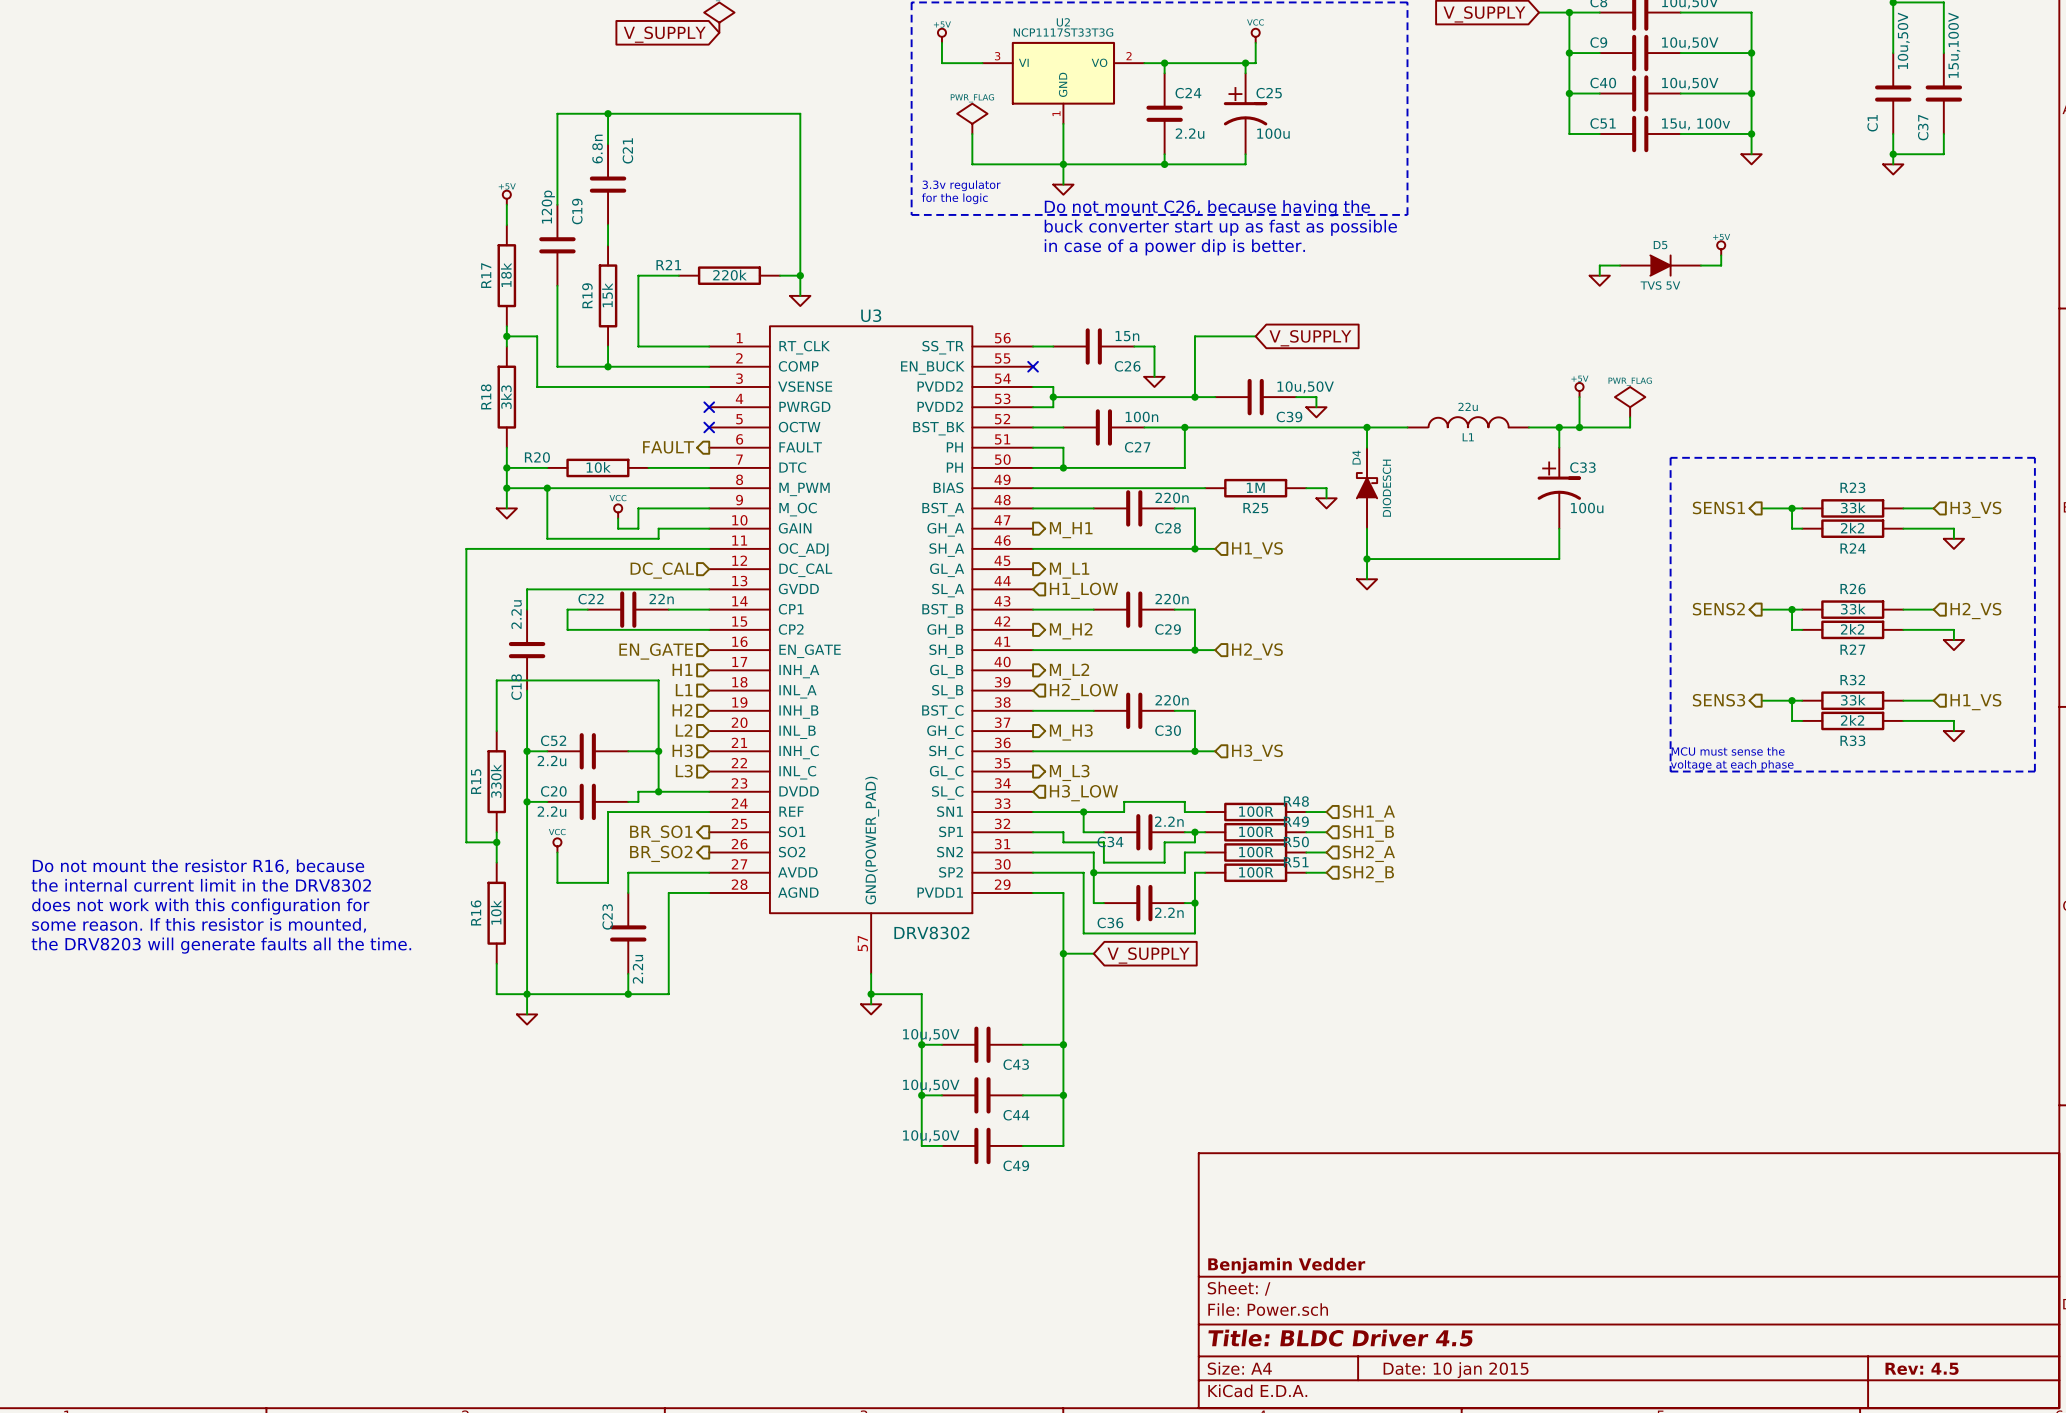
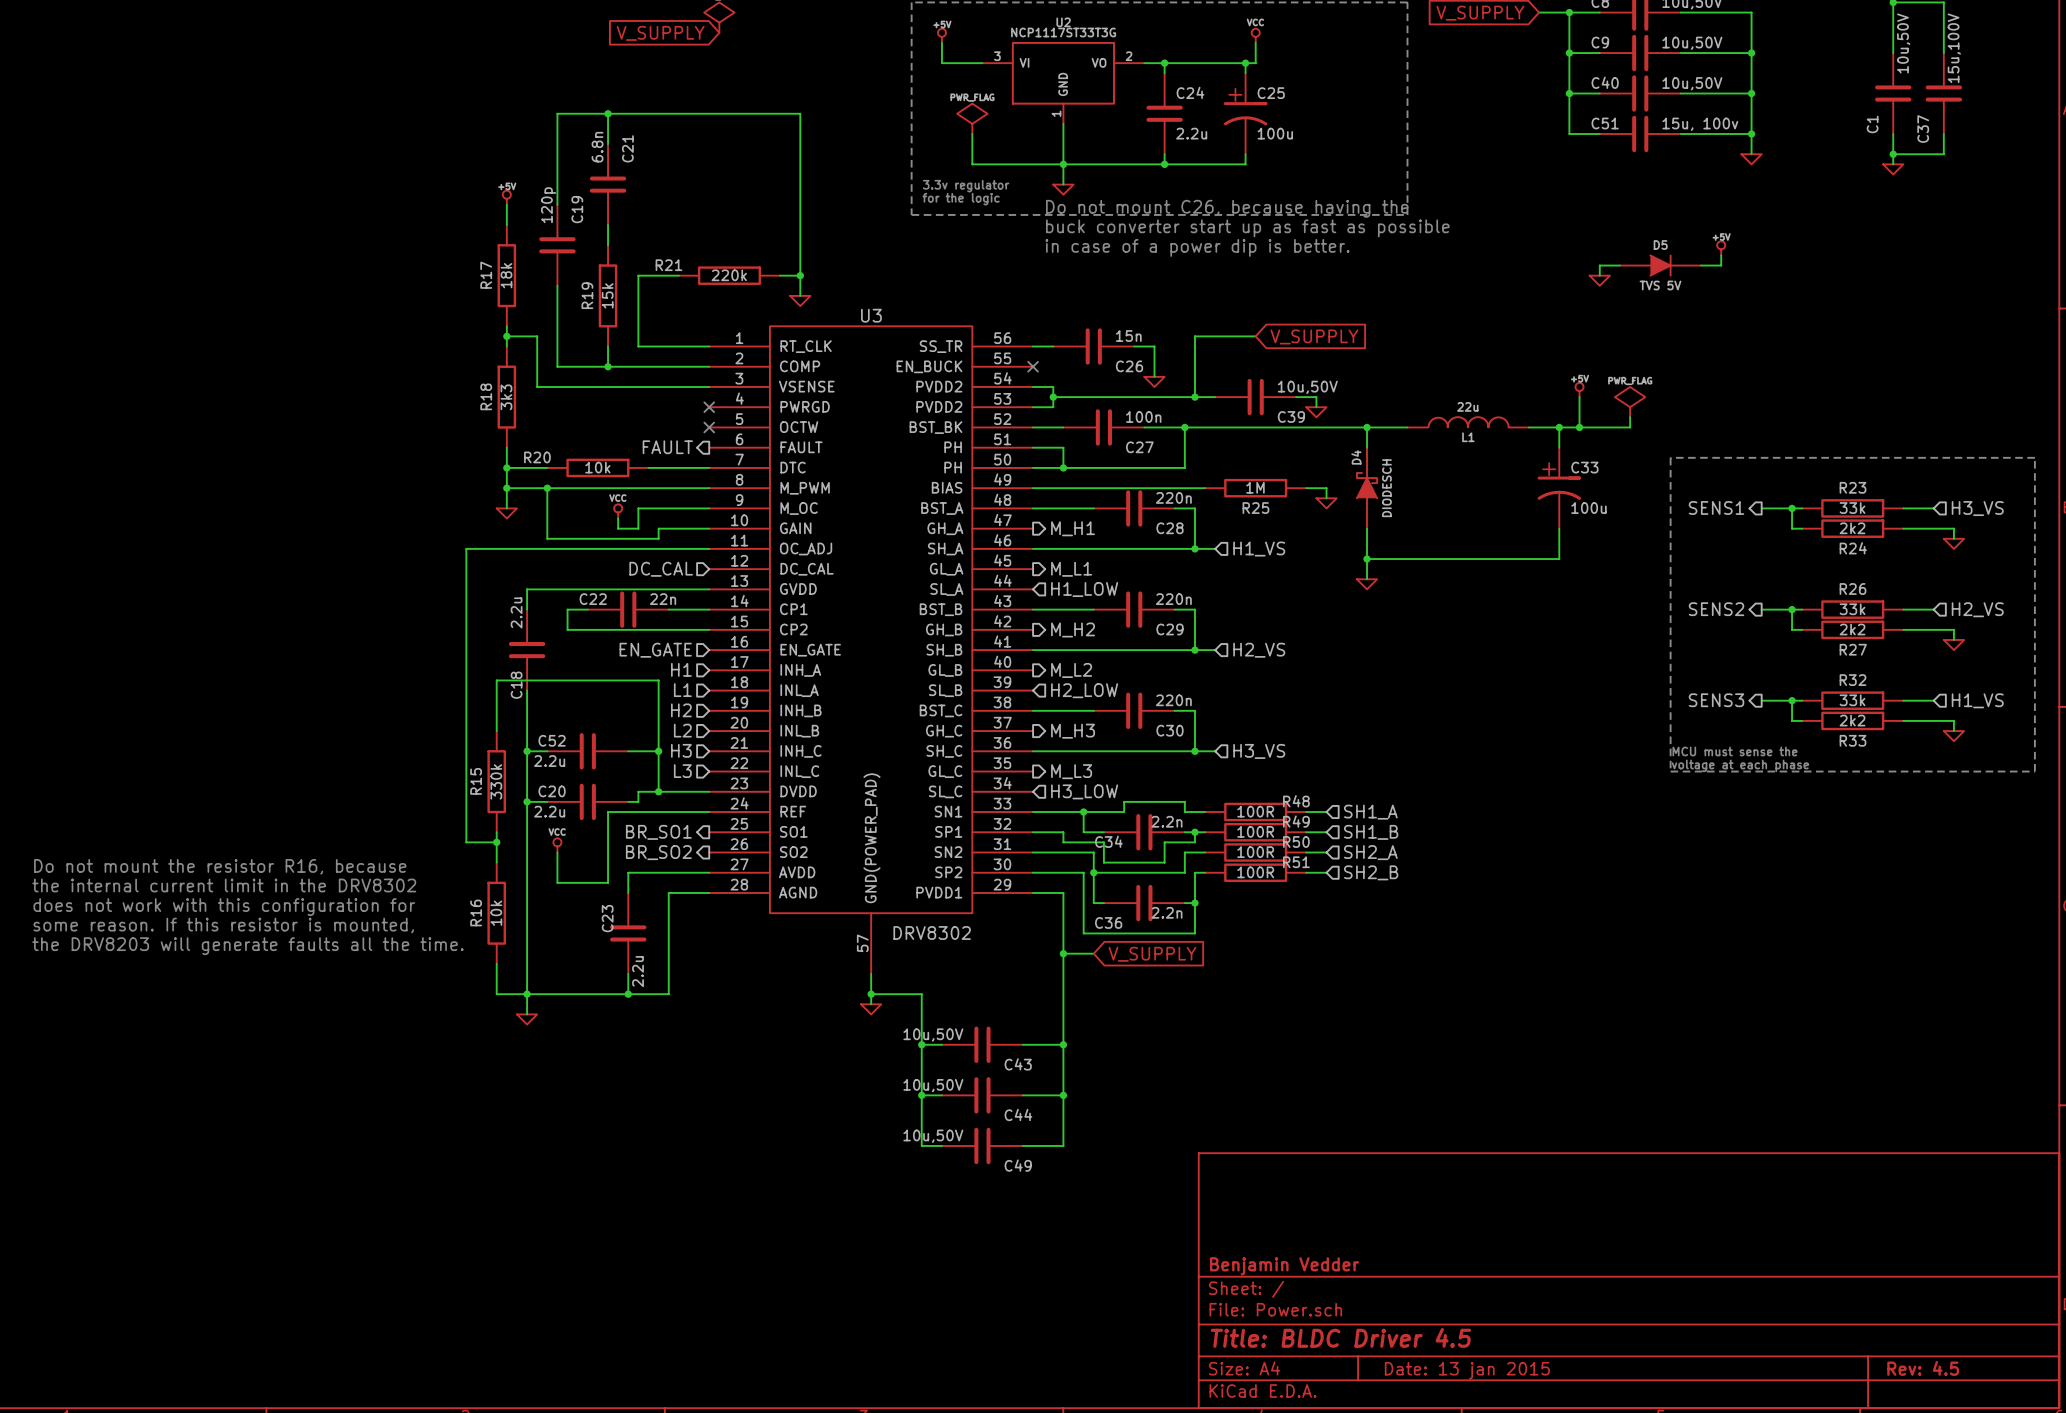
title block: Date: 10 jan 2015 (1456, 1370) -> Date: 13 jan 2015 (1467, 1370)

